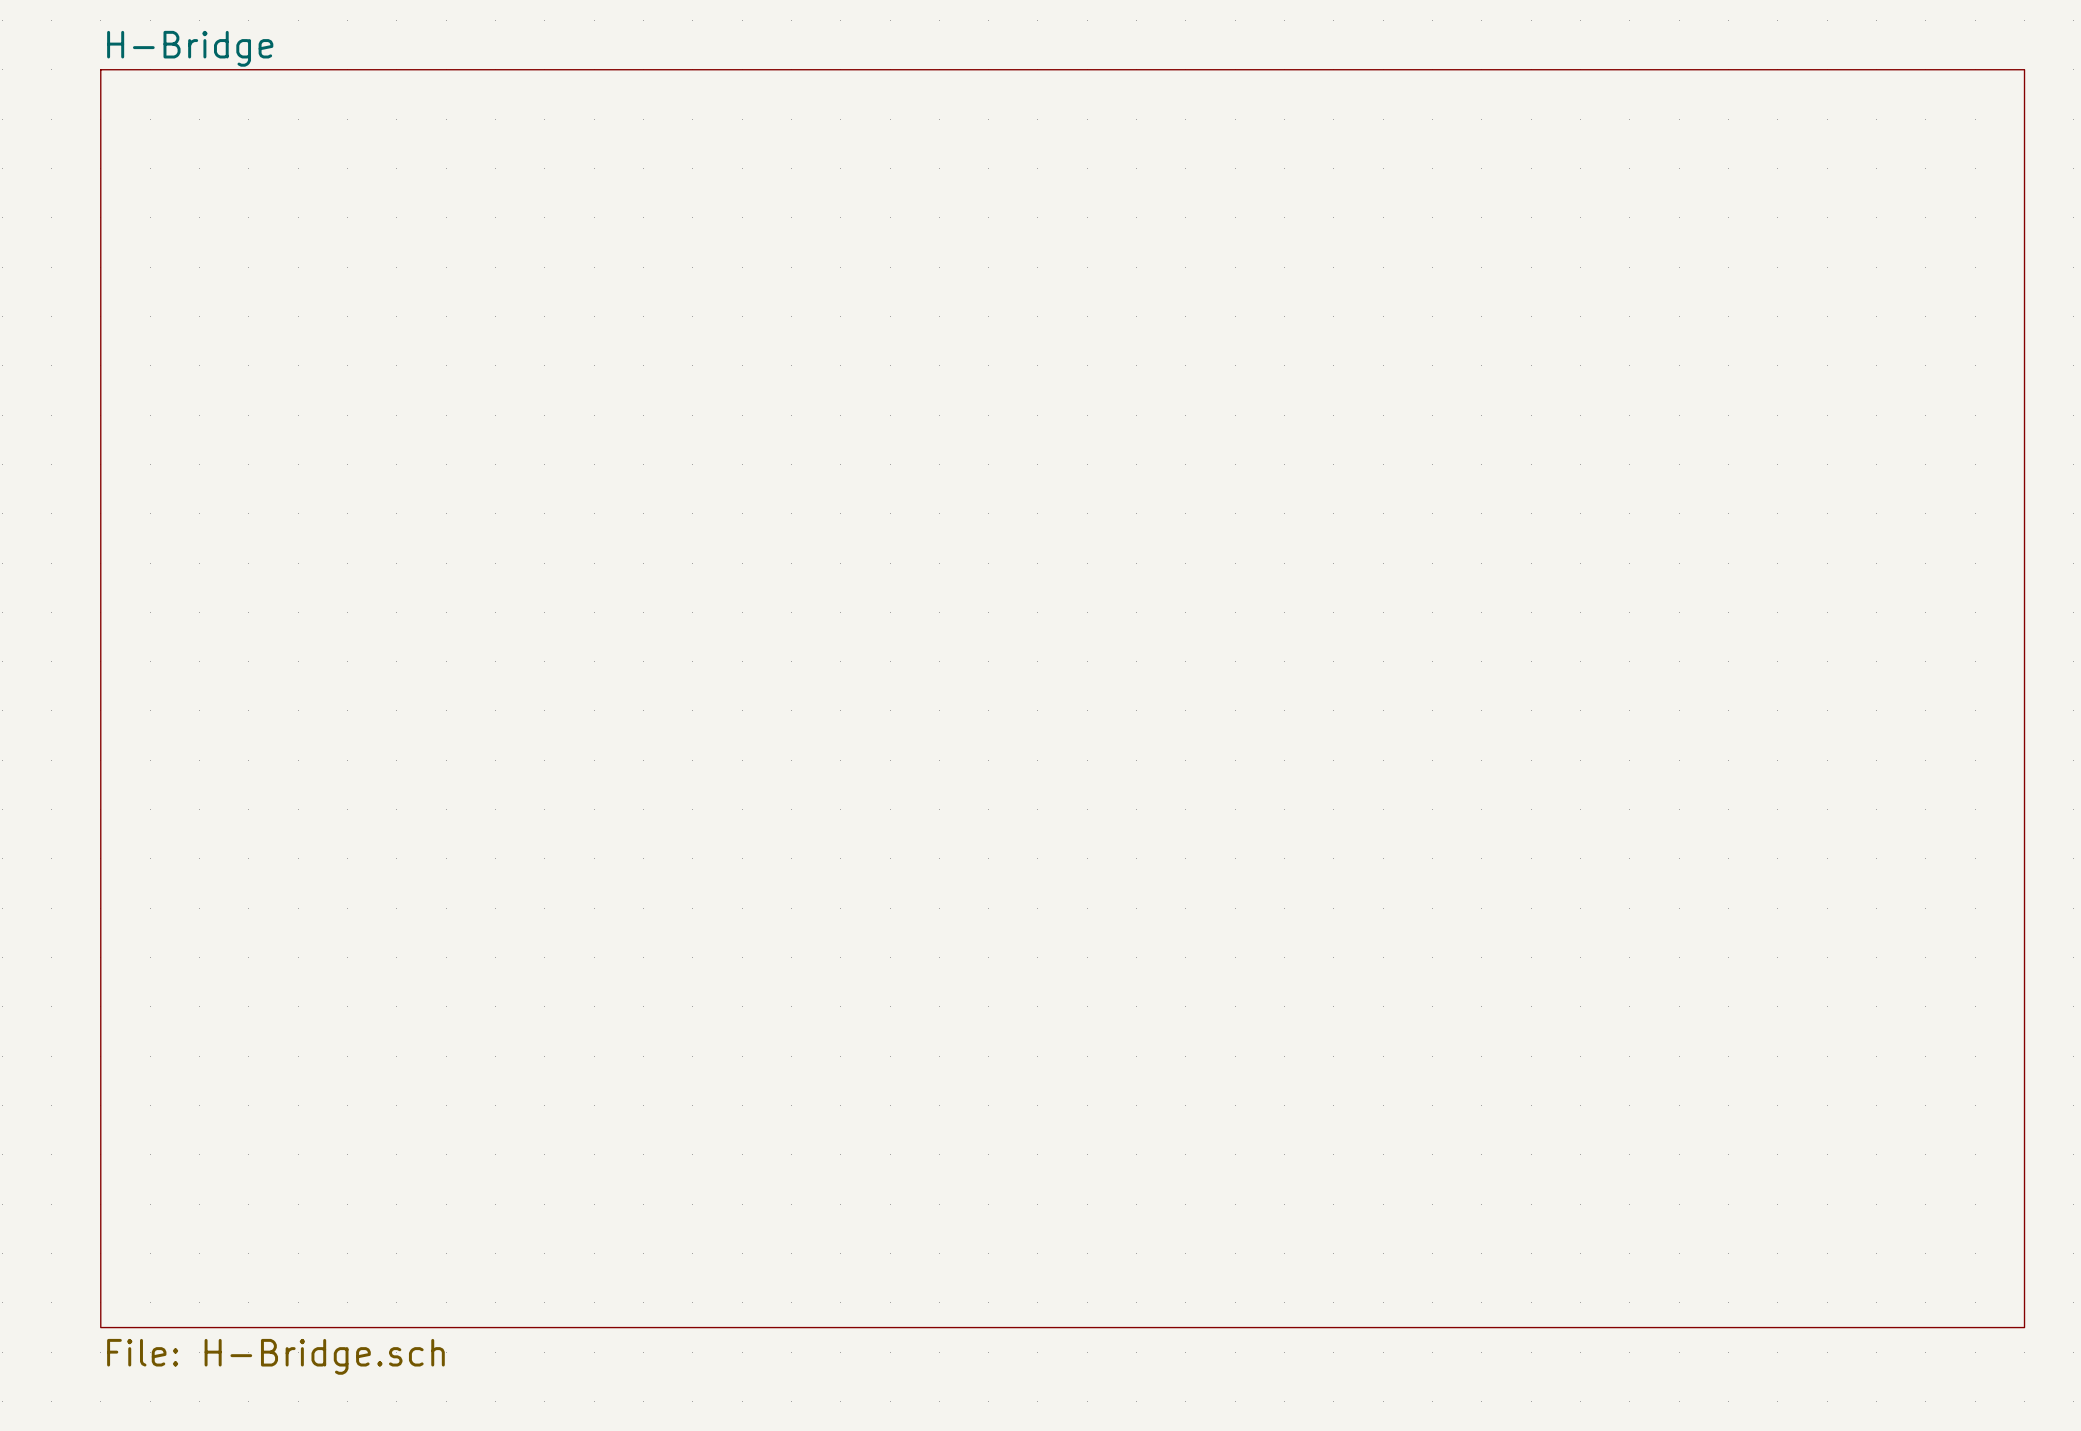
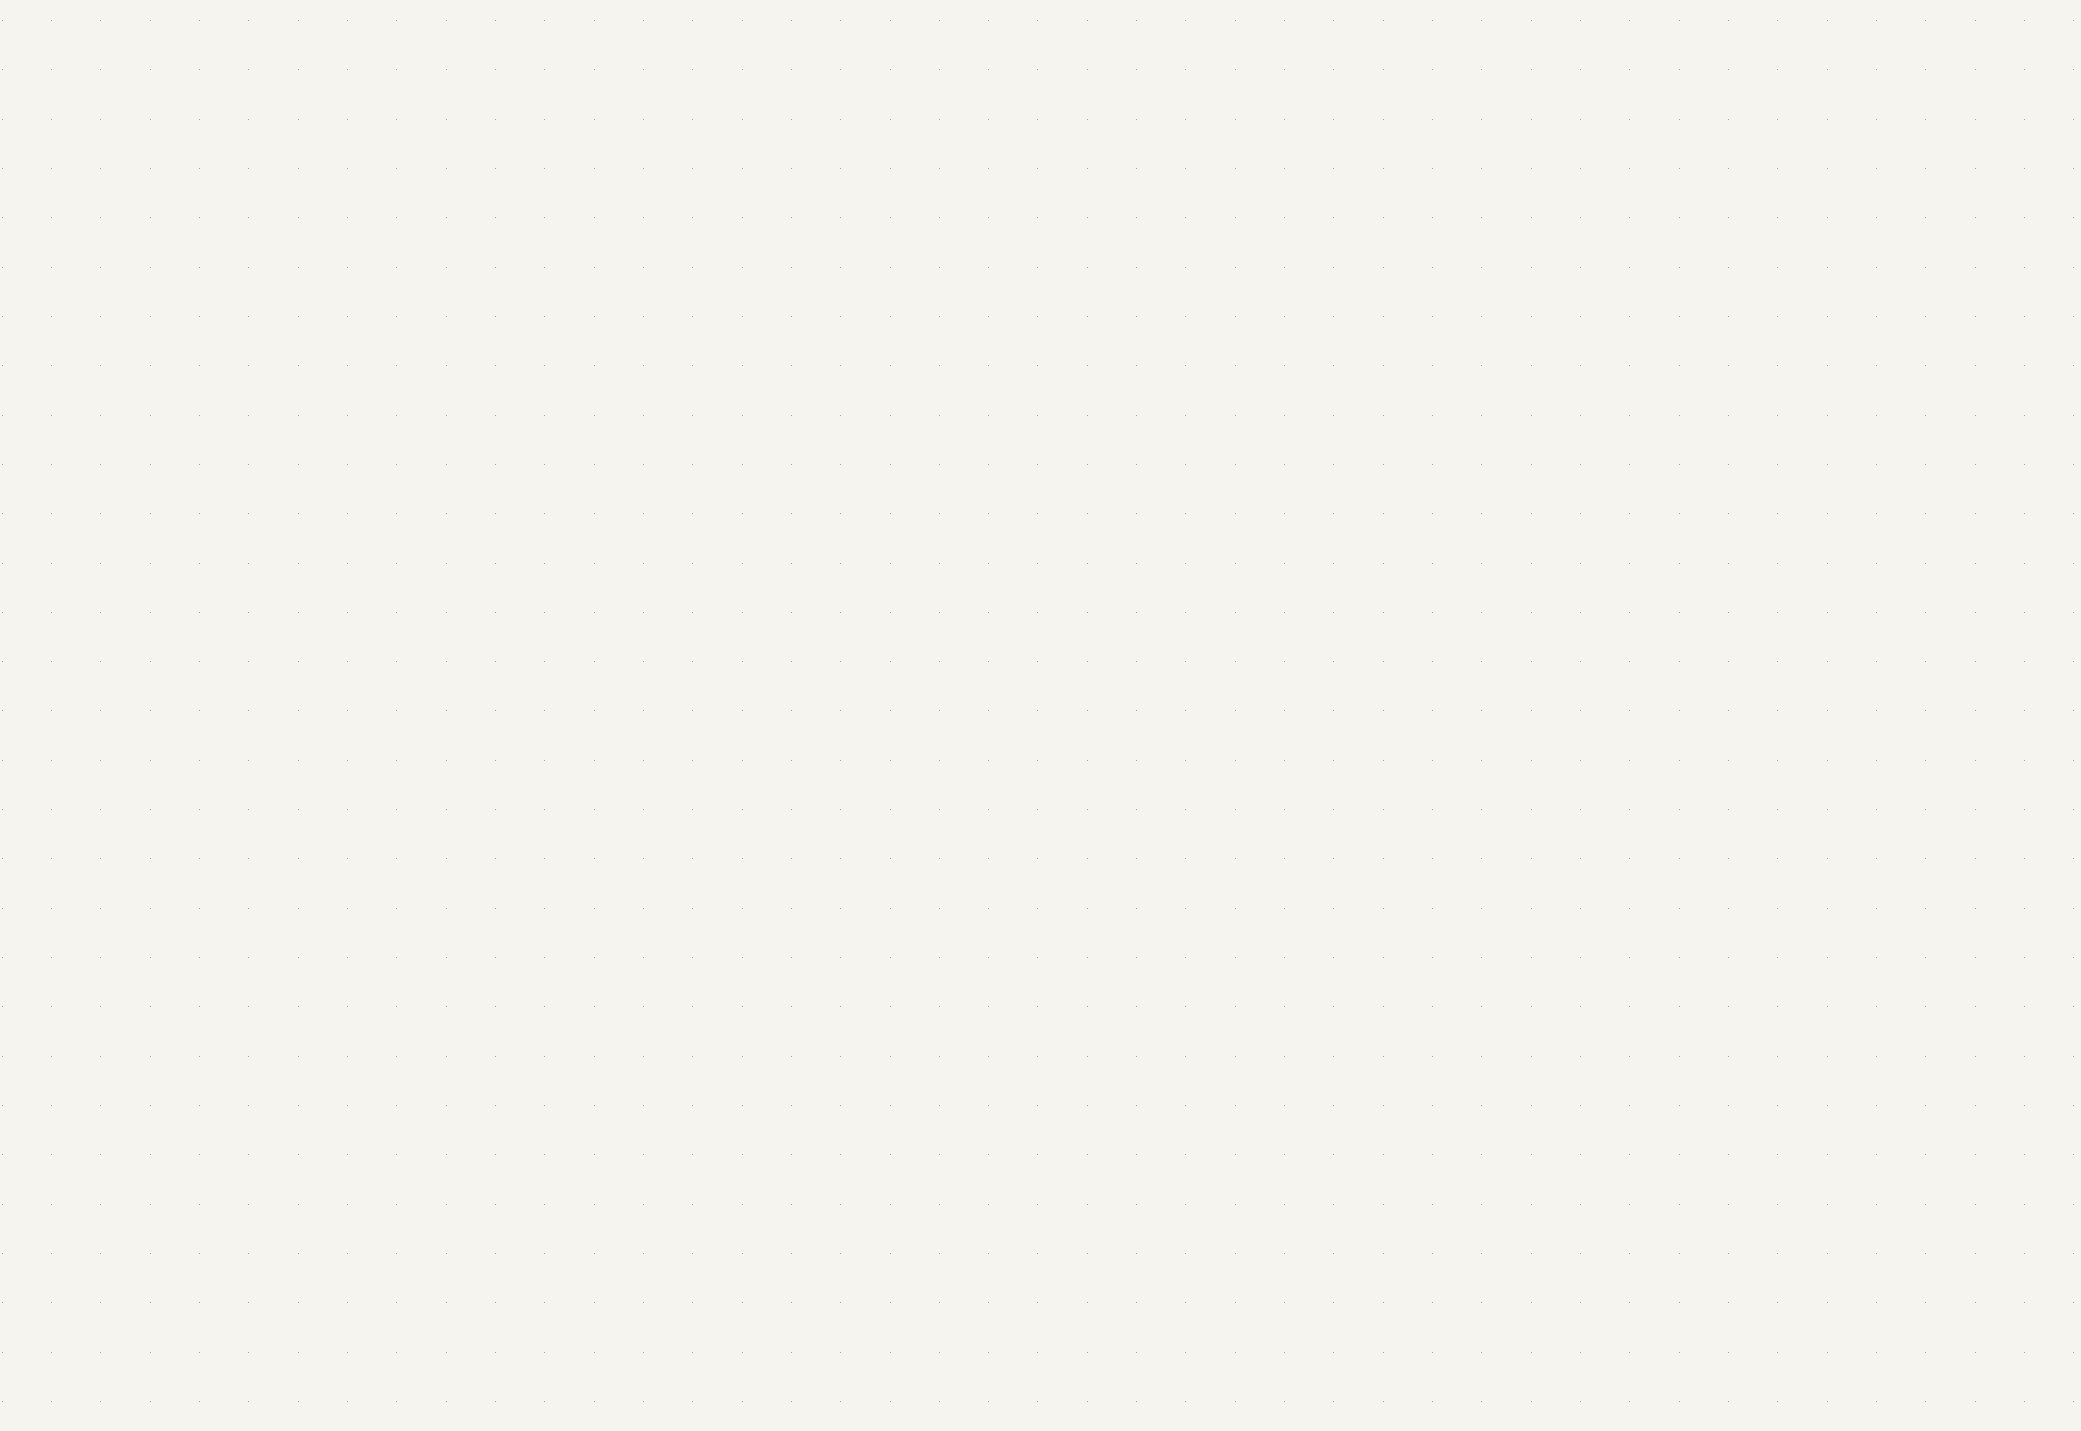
sheet H-Bridge: File: H-Bridge.sch (1062, 698) -> none

